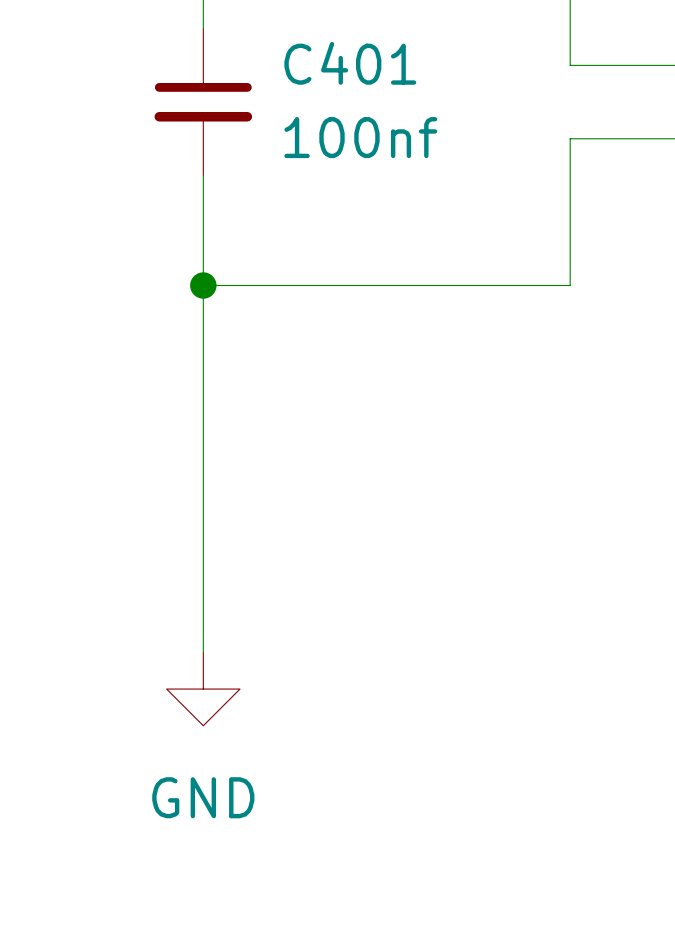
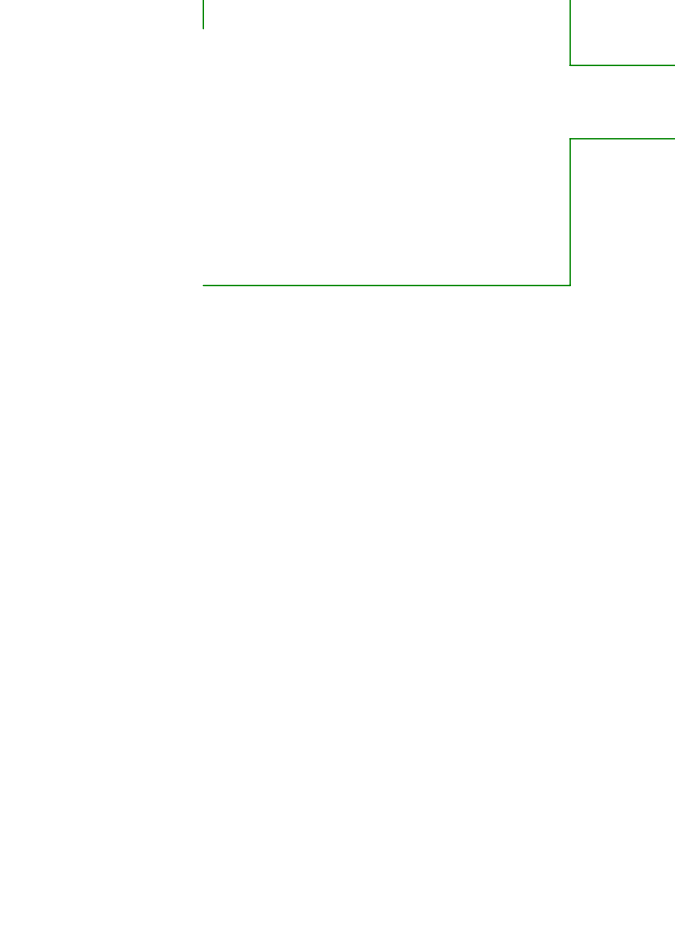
C401: (203, 102) -> none
wire: (203, 175) (203, 652) -> none
junction: (203, 285) -> none
power symbol: GND (203, 689) -> none

